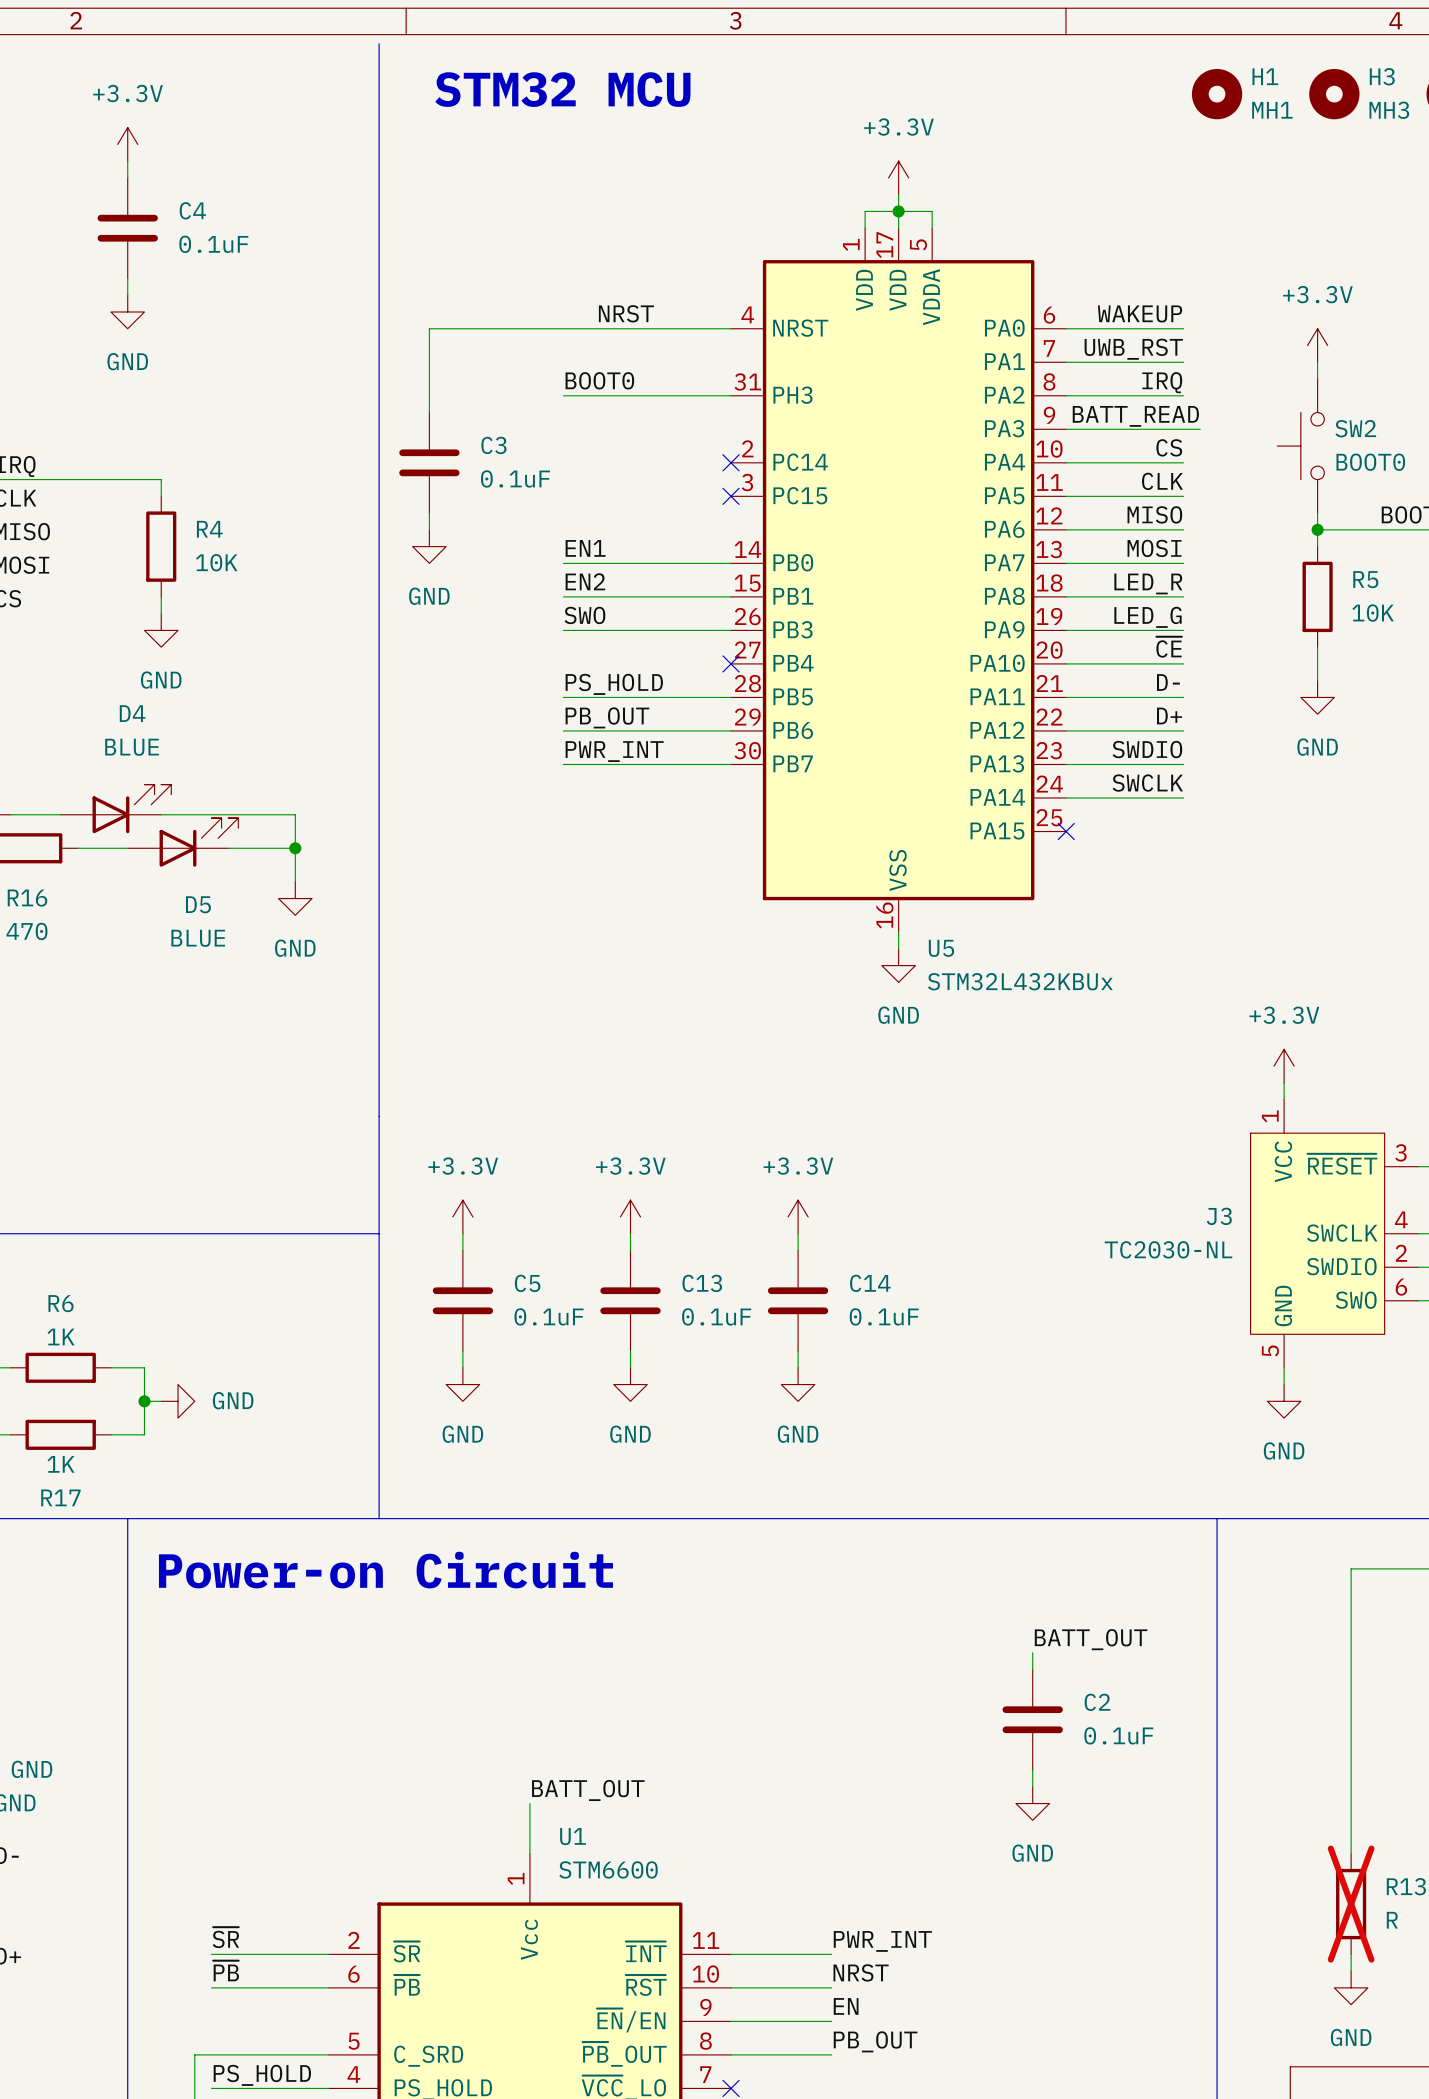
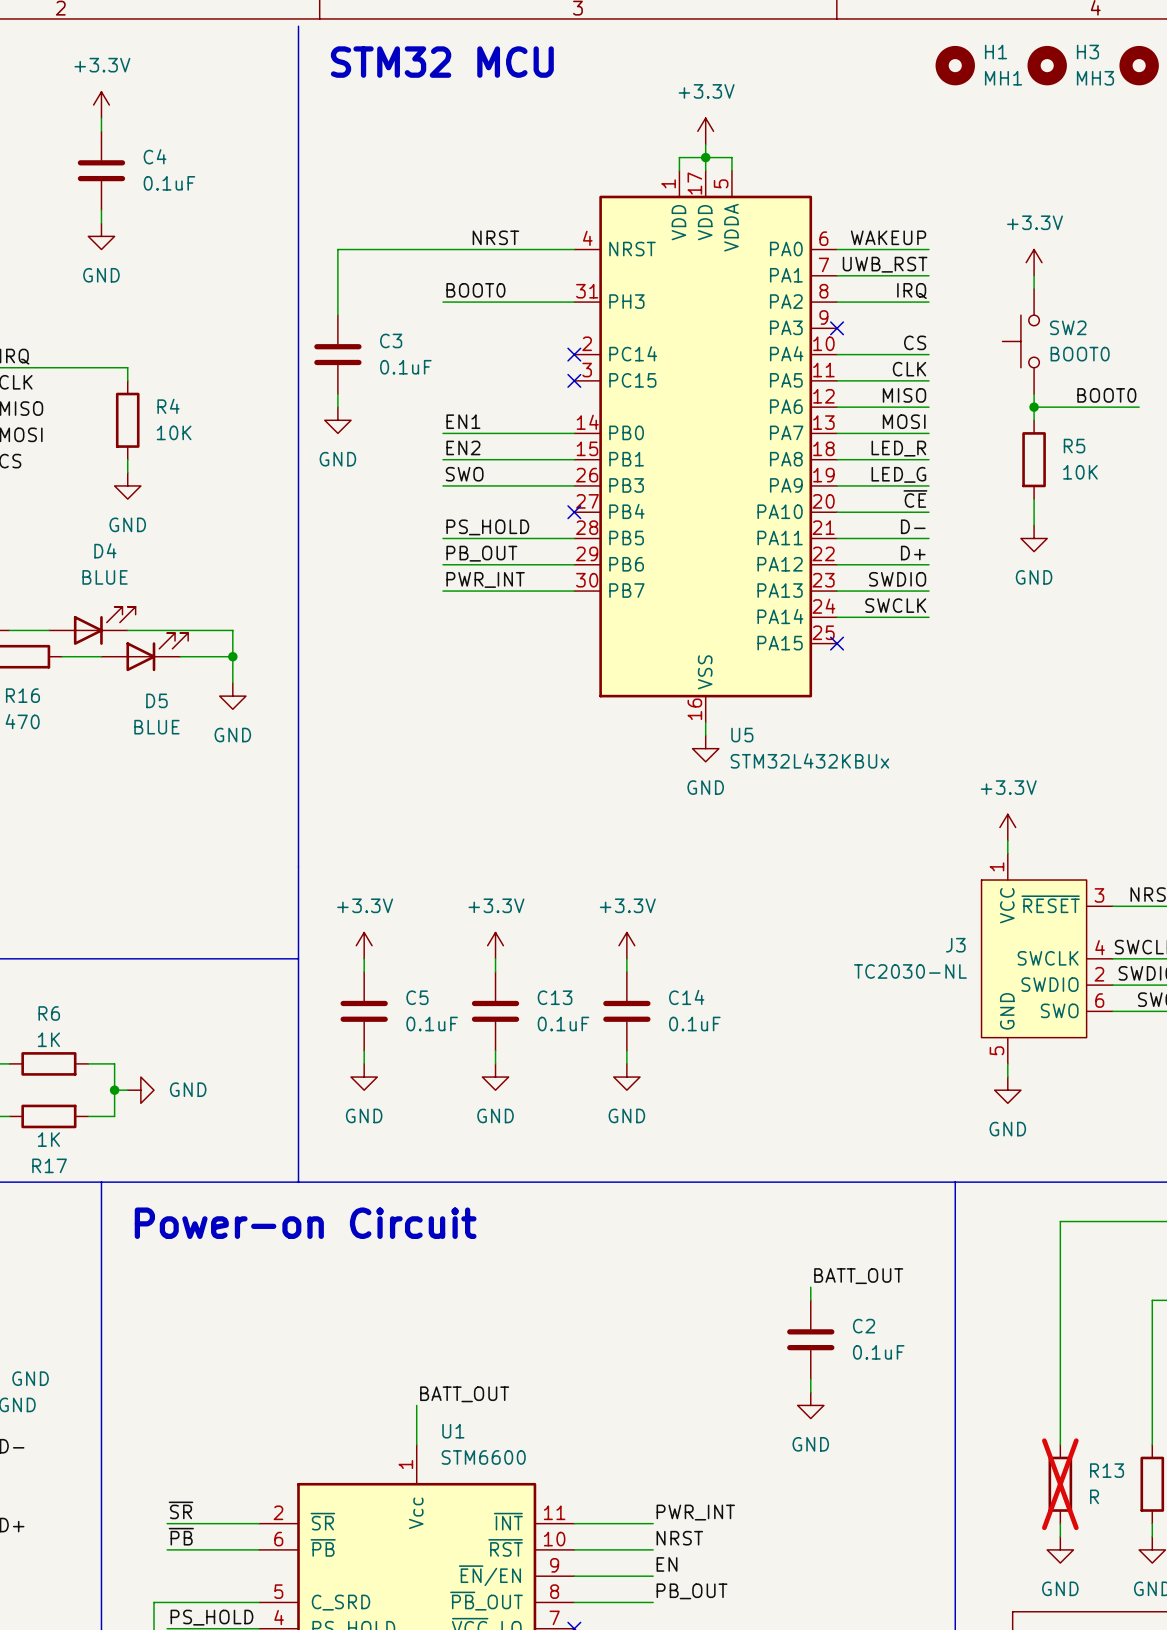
label: BATT_READ (1135, 416) -> none
wire: (1066, 429) (1200, 429) -> none
no-connect mark: none -> (837, 328)

